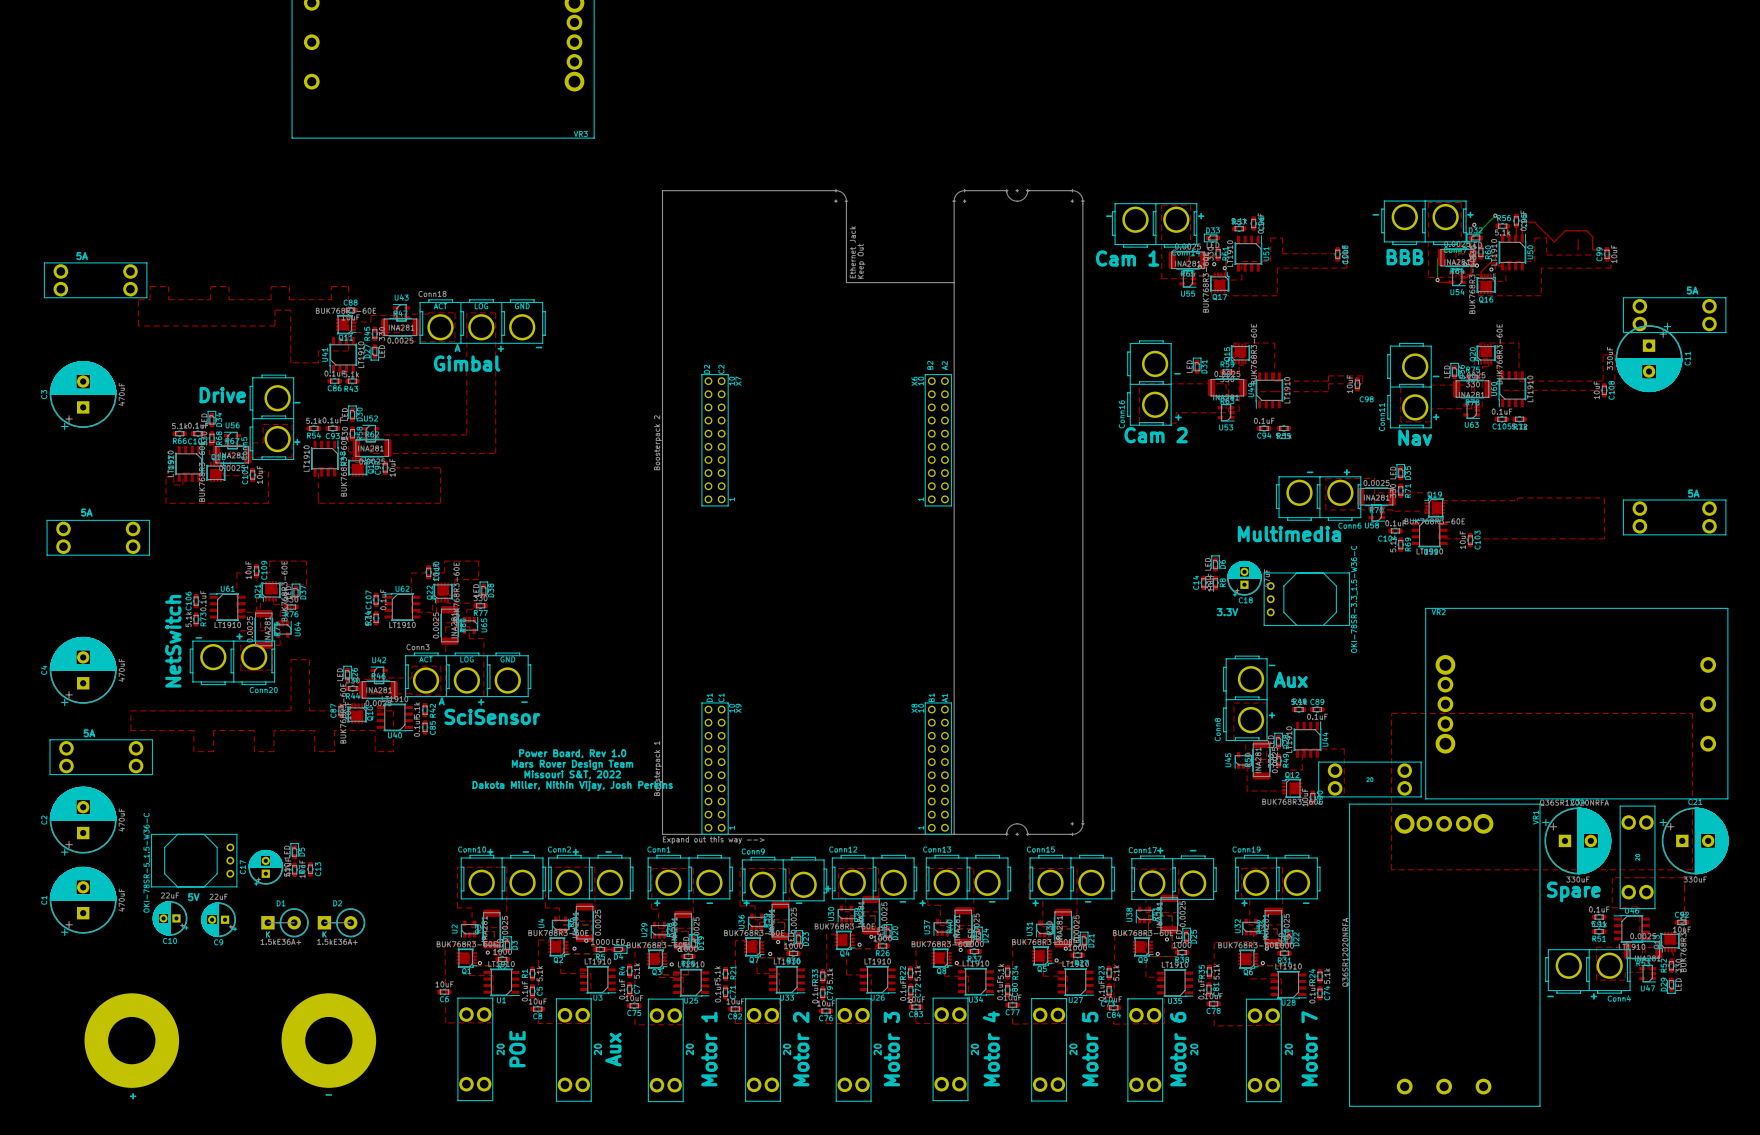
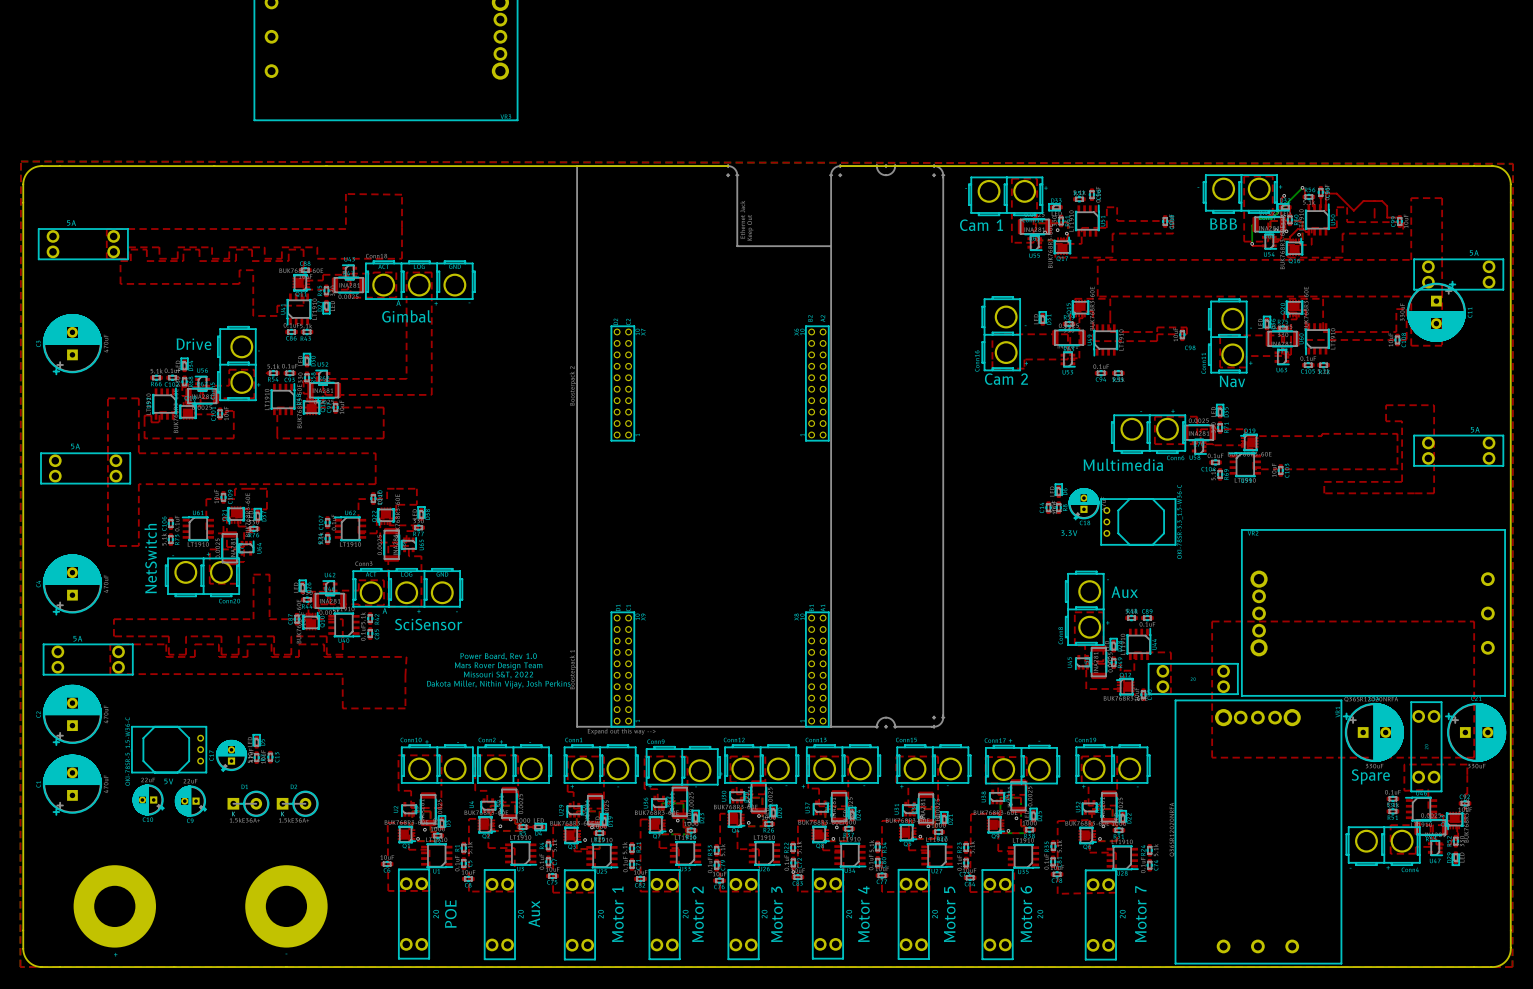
top zone outline: none -> (20, 161) (20, 967) (1512, 967) (1513, 163) (20, 161)
board edge: none -> (728, 166) (41, 166) (33, 167) (27, 172) (23, 184) (23, 948) (25, 956) (30, 963) (41, 967) (1493, 967) (1505, 961) (1510, 949) (1510, 184) (1506, 172) (1500, 167) (1492, 166) (840, 166)
top zone outline: none -> (345, 193) (402, 194) (402, 258) (317, 258) (317, 247) (281, 247) (281, 258) (264, 258) (264, 247) (229, 247) (229, 258) (212, 258) (212, 247) (177, 247) (177, 258) (159, 258) (159, 247) (128, 247) (128, 258) (106, 258) (106, 229) (345, 229) (345, 193)
top zone outline: none -> (1411, 198) (1411, 259) (1097, 259) (1097, 296) (1411, 296) (1411, 345) (1442, 345) (1442, 198) (1411, 198)
top zone outline: none -> (107, 398) (138, 398) (138, 453) (375, 453) (375, 484) (138, 484) (138, 545) (107, 545) (107, 398)
top zone outline: none -> (1386, 405) (1386, 421) (1402, 421) (1402, 481) (1324, 481) (1324, 493) (1434, 493) (1434, 405) (1386, 405)
top zone outline: none -> (110, 644) (166, 644) (166, 656) (194, 656) (194, 644) (218, 644) (218, 656) (247, 656) (247, 644) (271, 644) (271, 656) (299, 656) (299, 644) (324, 644) (324, 656) (406, 656) (405, 708) (342, 708) (342, 674) (110, 674) (110, 644)

